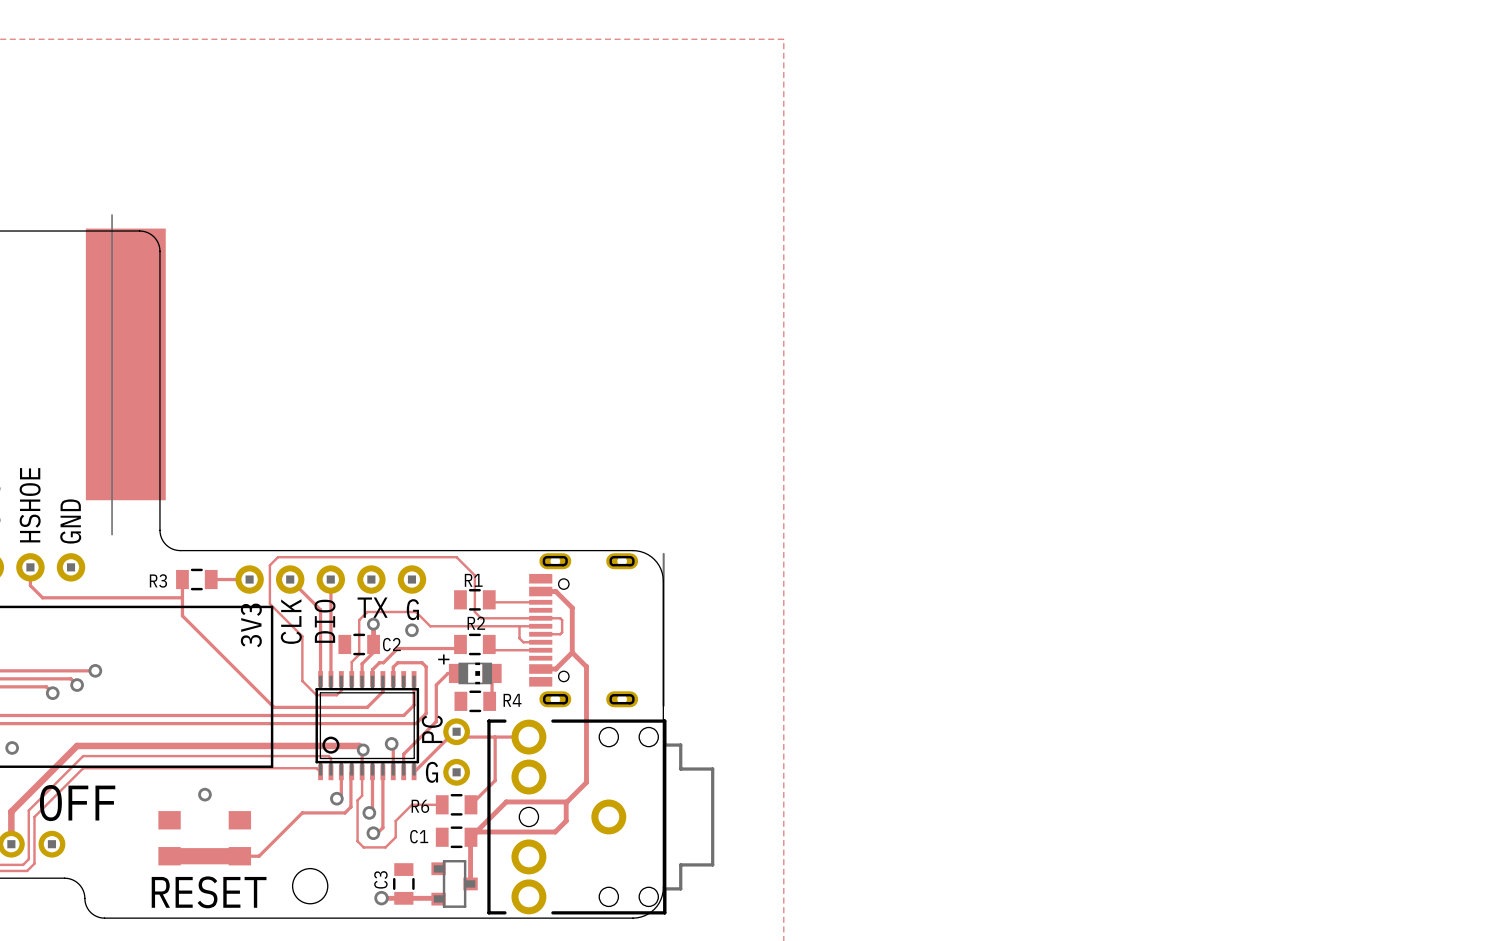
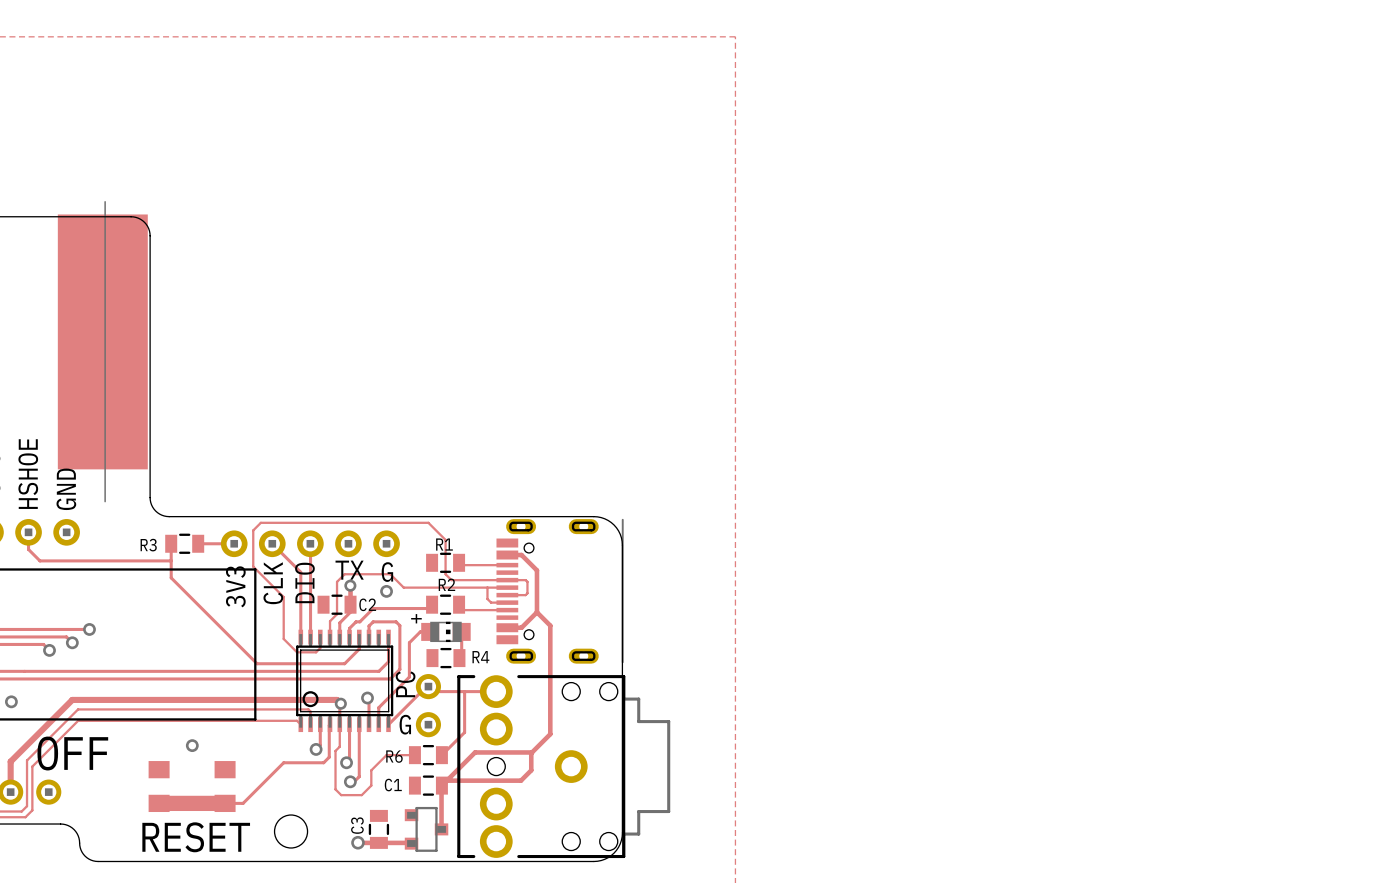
part: none -> (102, 341)
part: (125, 364) -> none

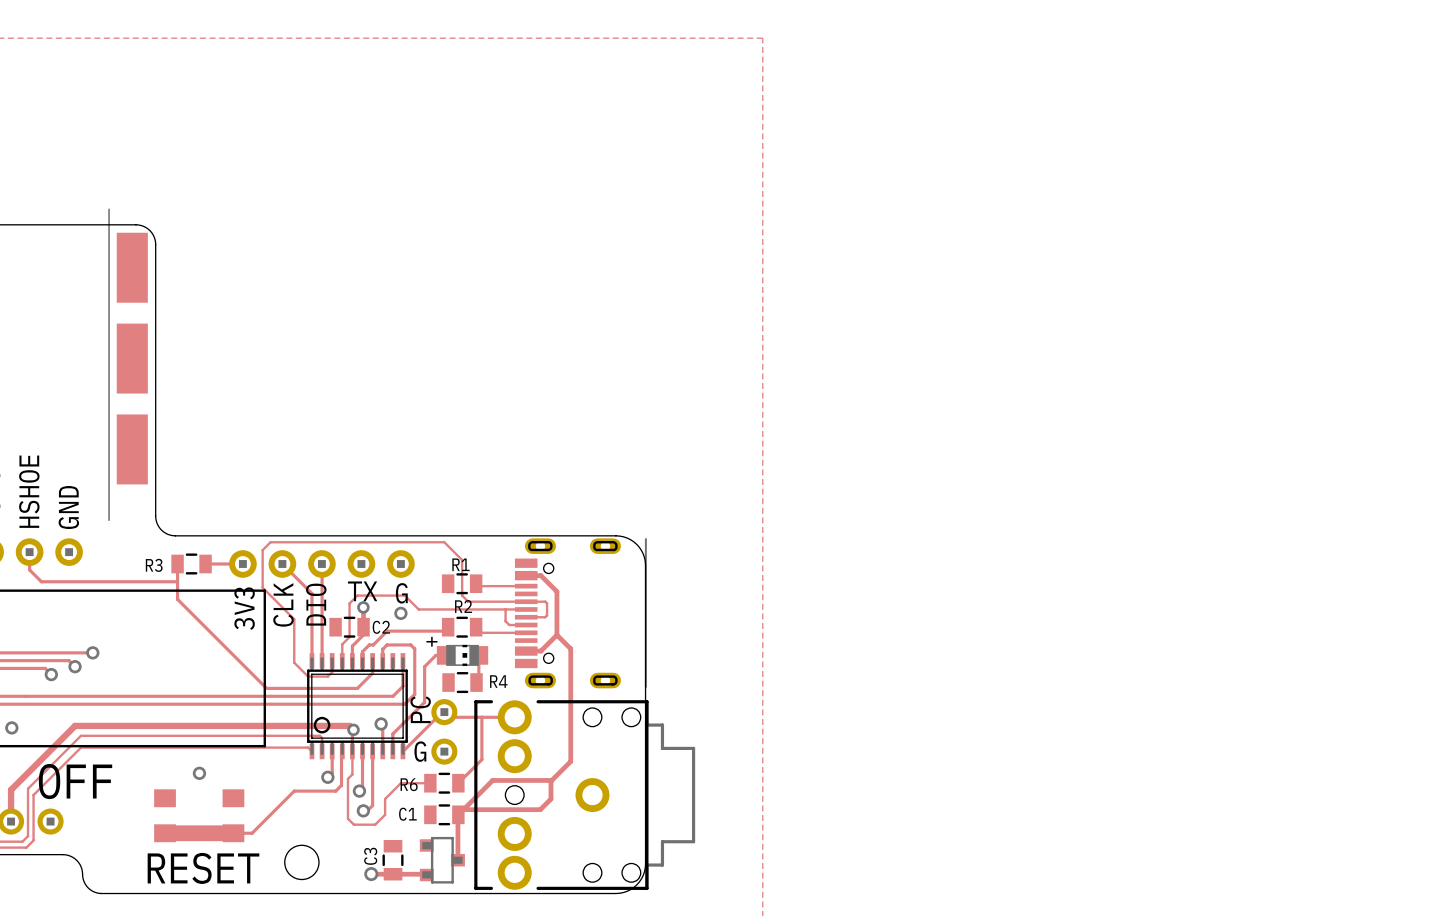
part: none -> (132, 267)
part: (102, 341) -> none
part: none -> (132, 358)
part: none -> (132, 449)

